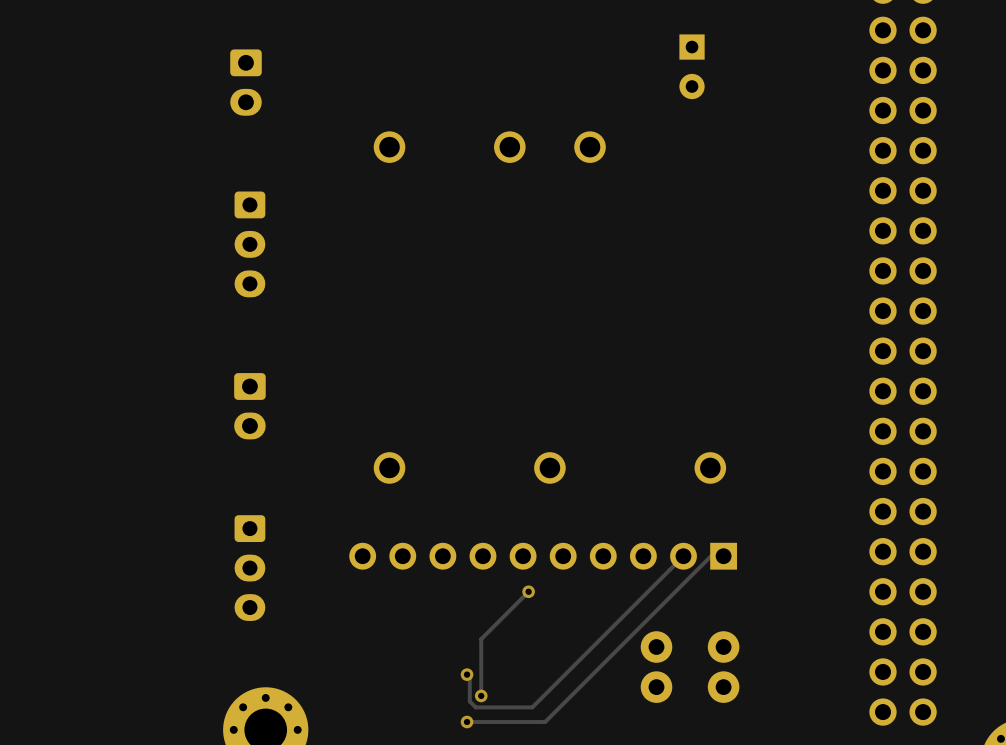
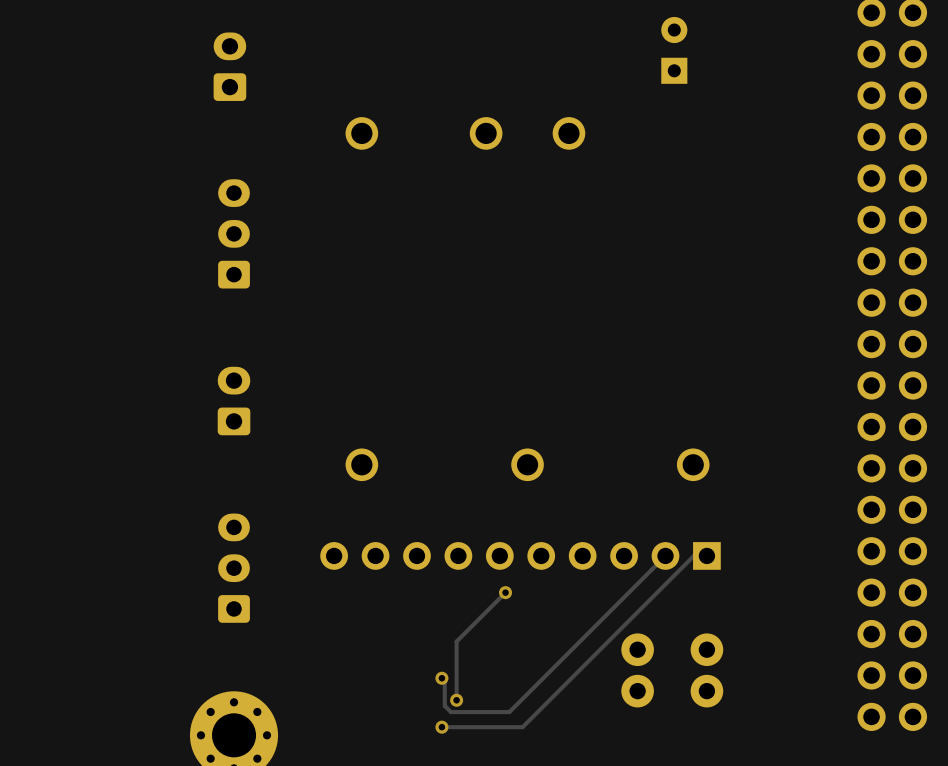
part rotation: 0° (692, 66) -> 180° (674, 50)
part rotation: 0° (245, 82) -> 180° (229, 66)
part rotation: 0° (249, 244) -> 180° (234, 233)
part rotation: 0° (249, 406) -> 180° (234, 401)
part rotation: 0° (249, 568) -> 180° (234, 568)

